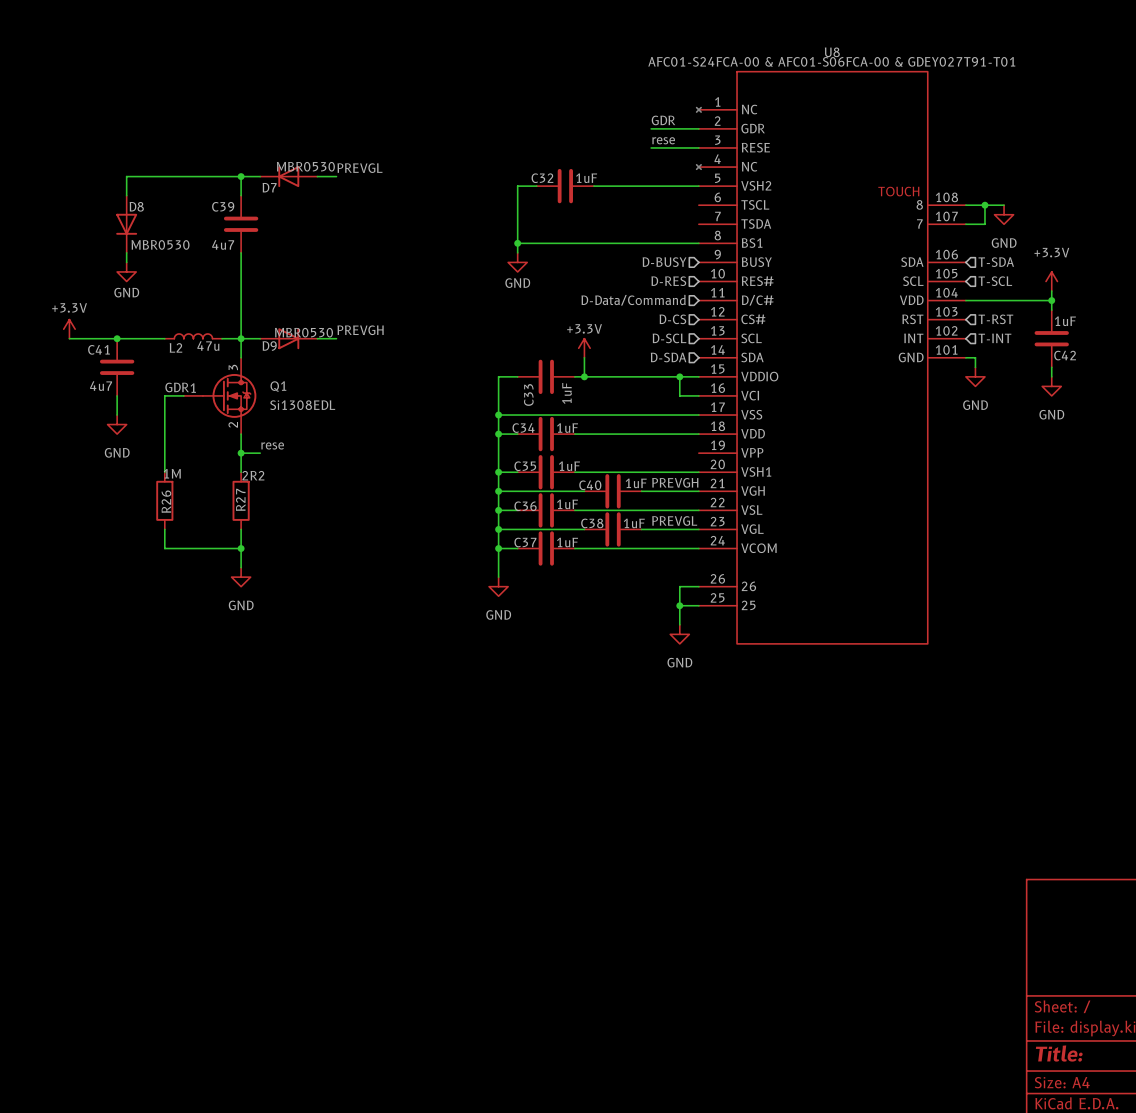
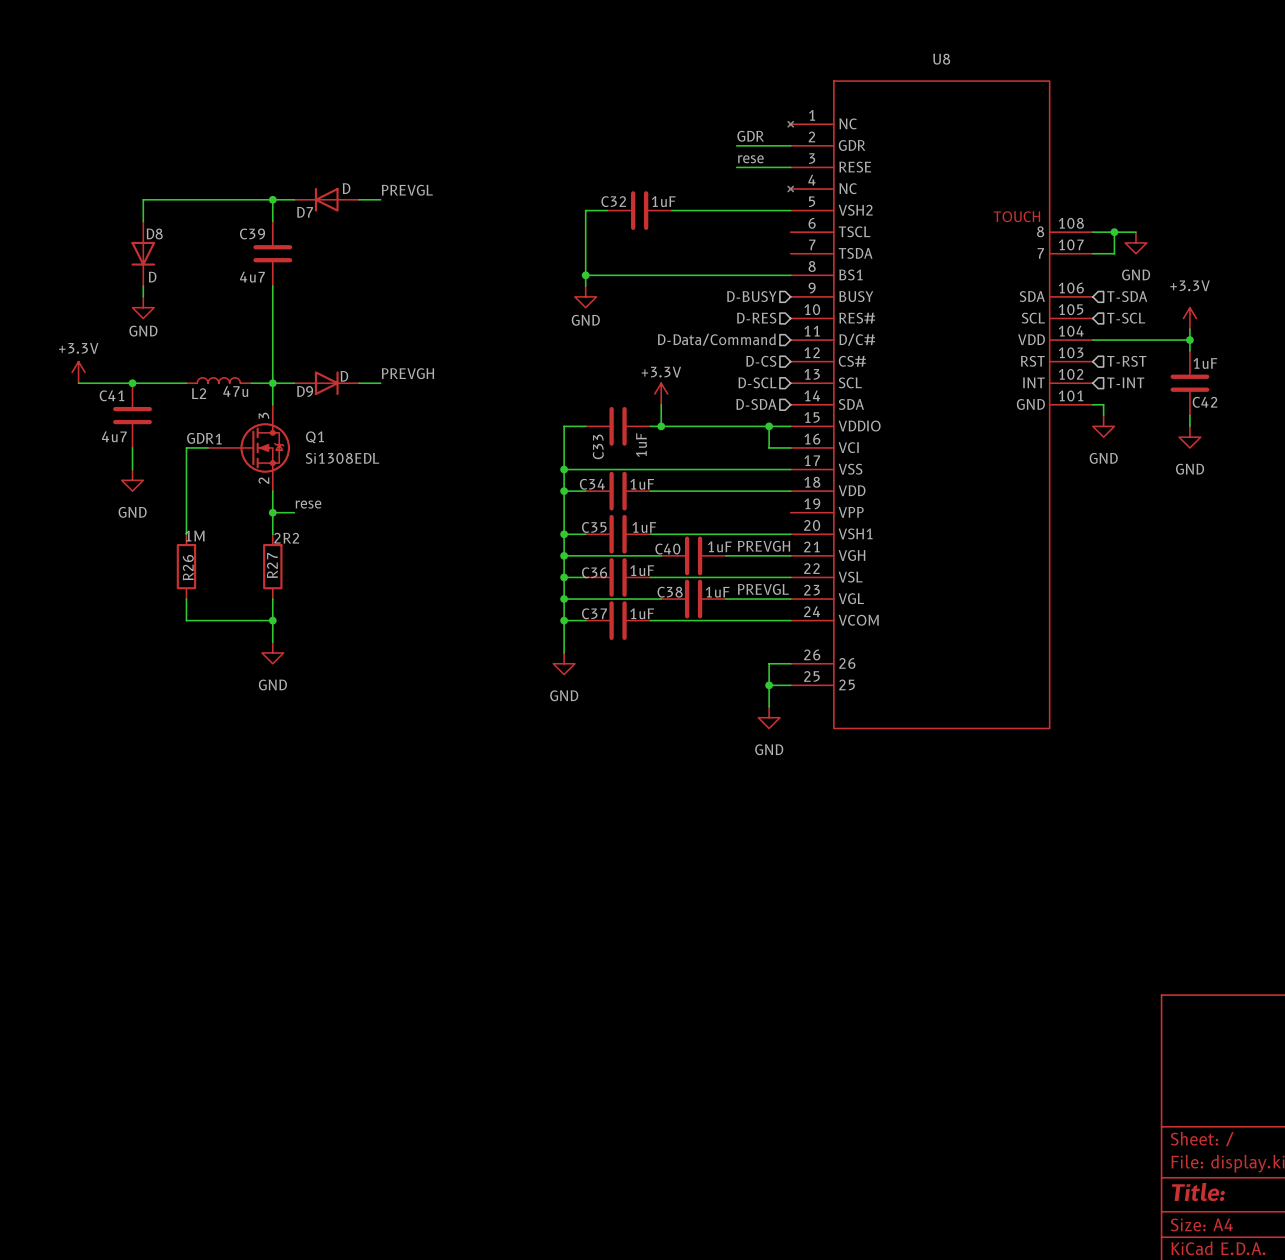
U8 value: AFC01-S24FCA-00 & AFC01-S06FCA-00 & GDEY027T91-T01 (831, 61) -> none
D7 value: MBR0530 (305, 166) -> D (346, 188)
D8 value: MBR0530 (160, 244) -> D (152, 277)
D9 value: MBR0530 (303, 332) -> D (344, 376)

